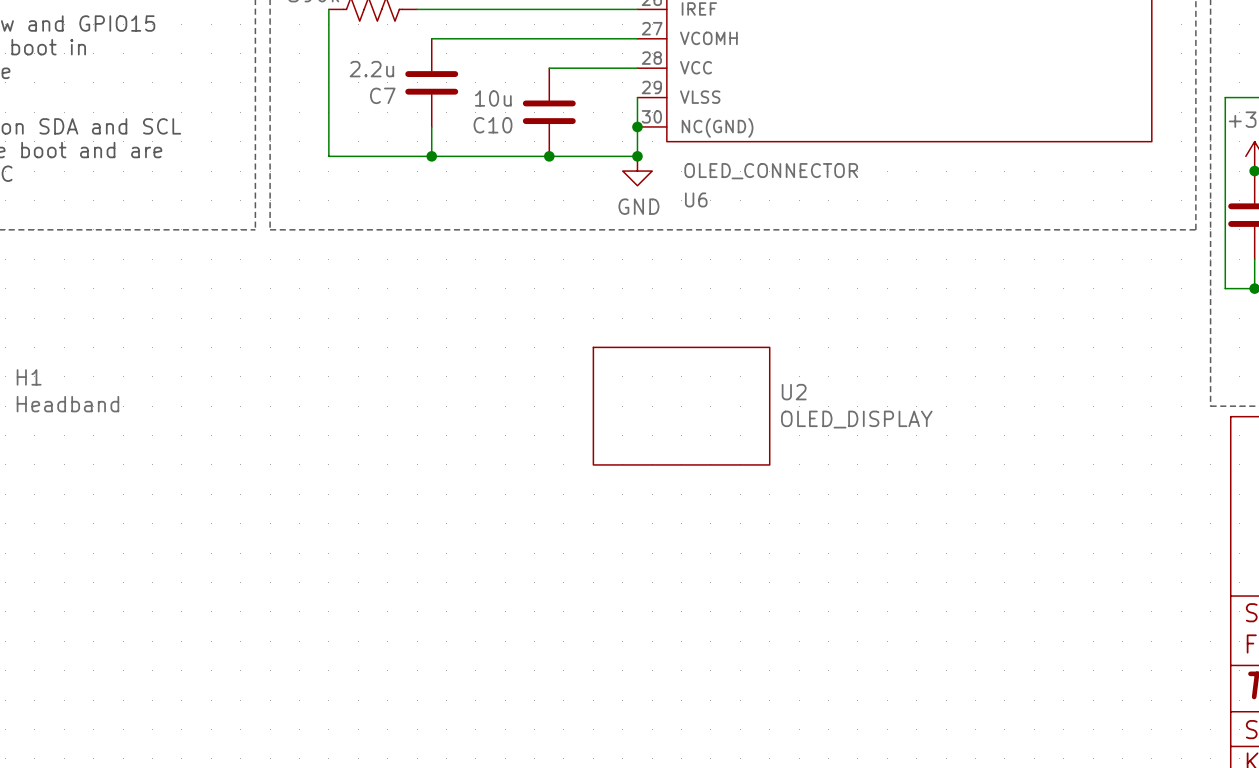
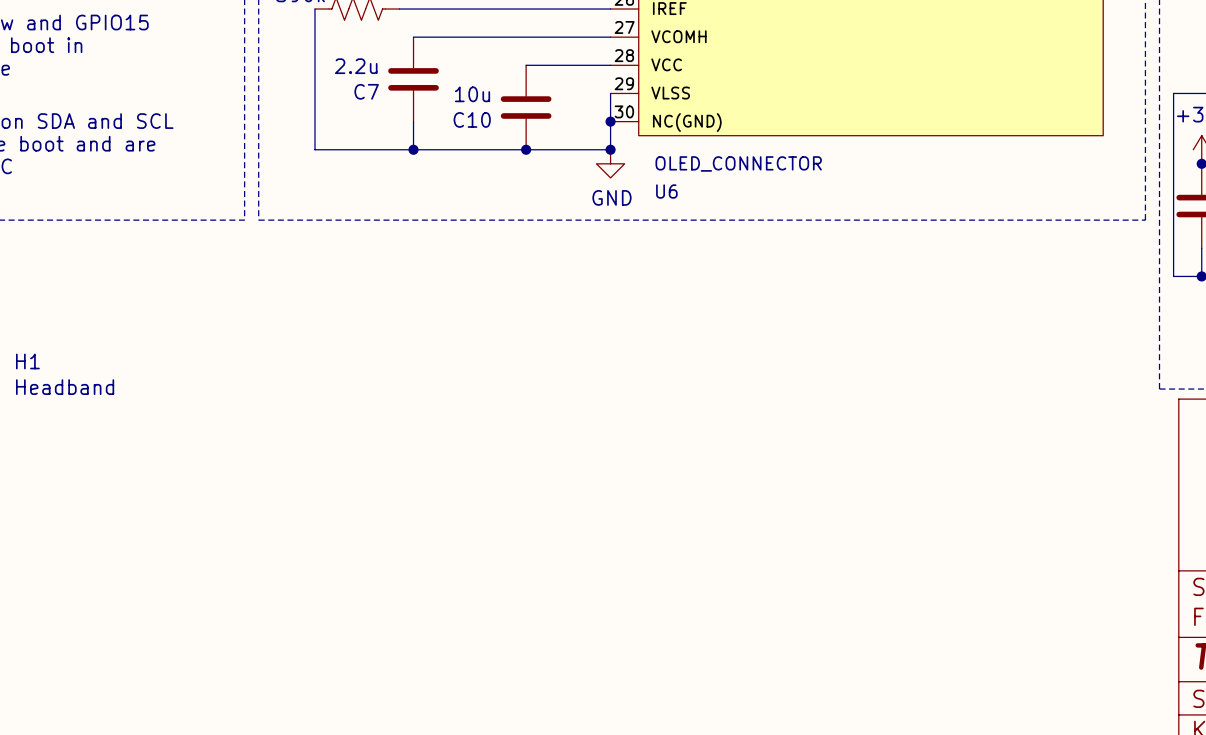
U2: OLED_DISPLAY (681, 406) -> none

